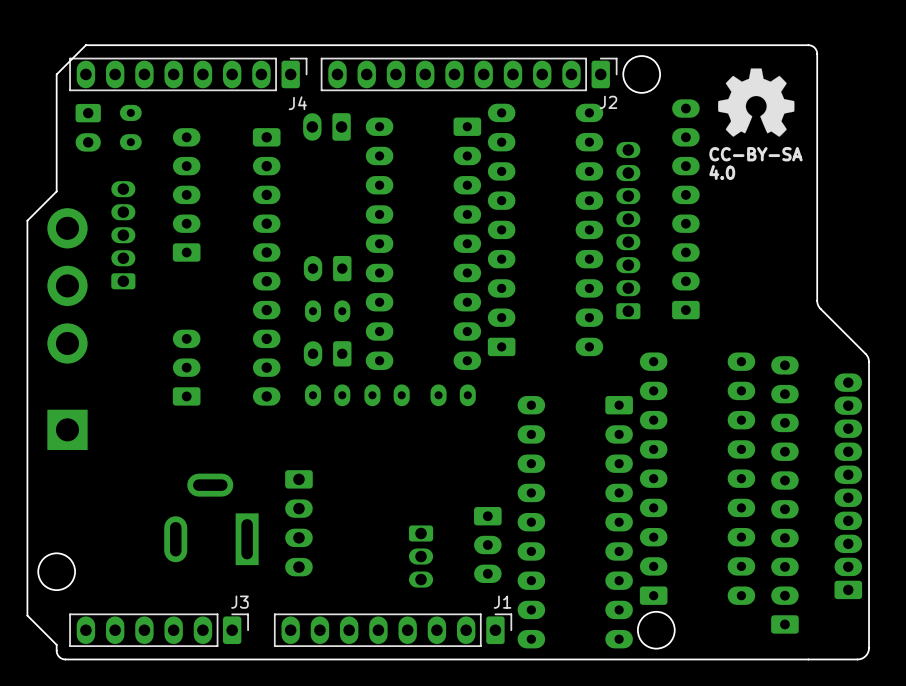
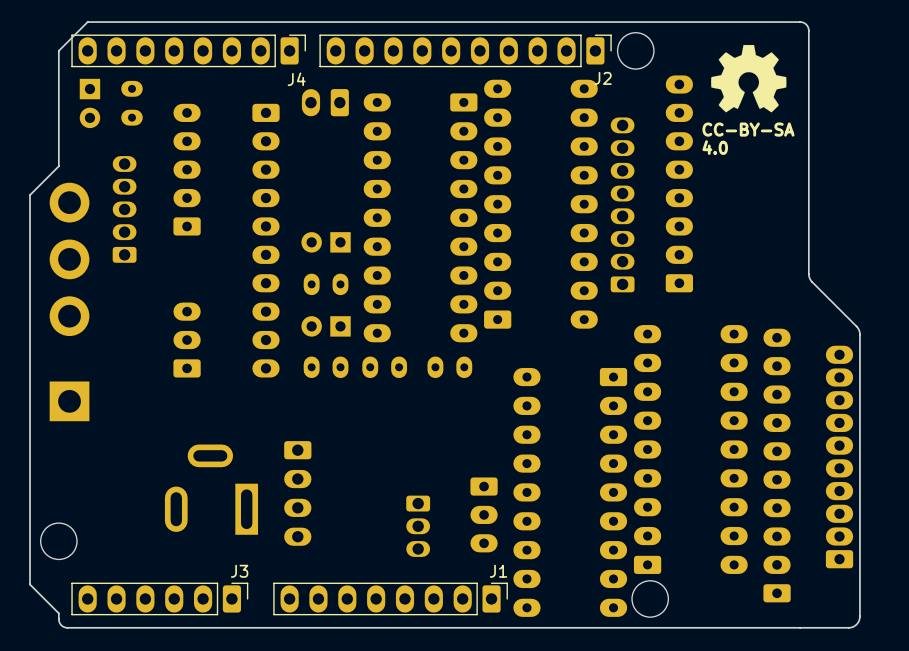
part footprint: [75, 103, 101, 152] -> [79, 78, 101, 129]
part footprint: [303, 255, 352, 282] -> [301, 232, 351, 253]
part footprint: [303, 341, 352, 367] -> [301, 316, 351, 337]

